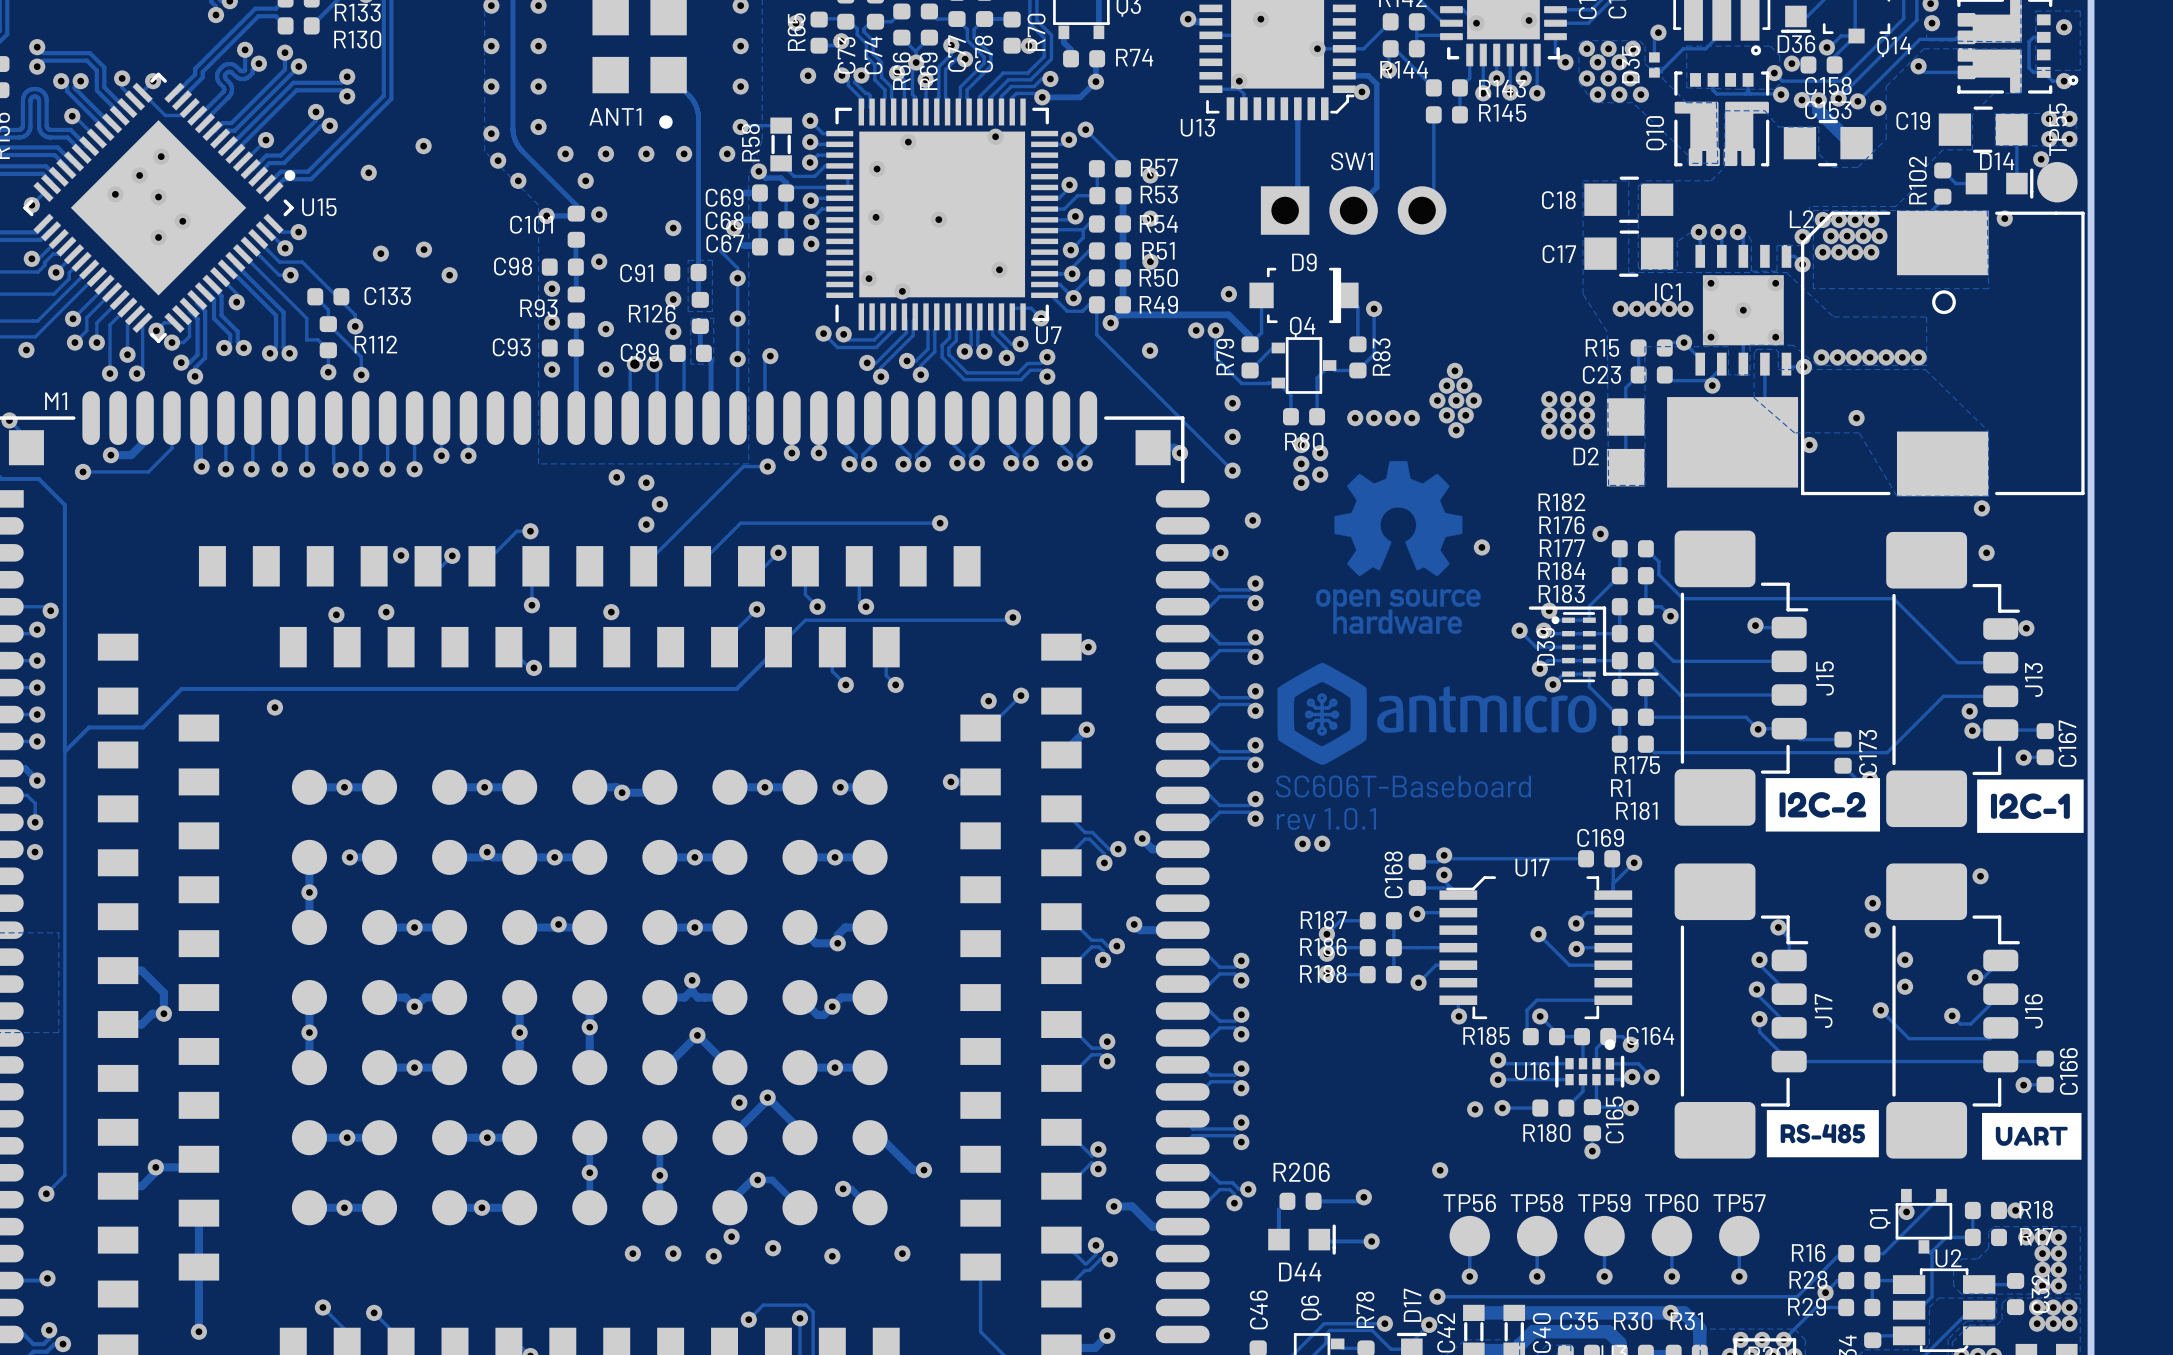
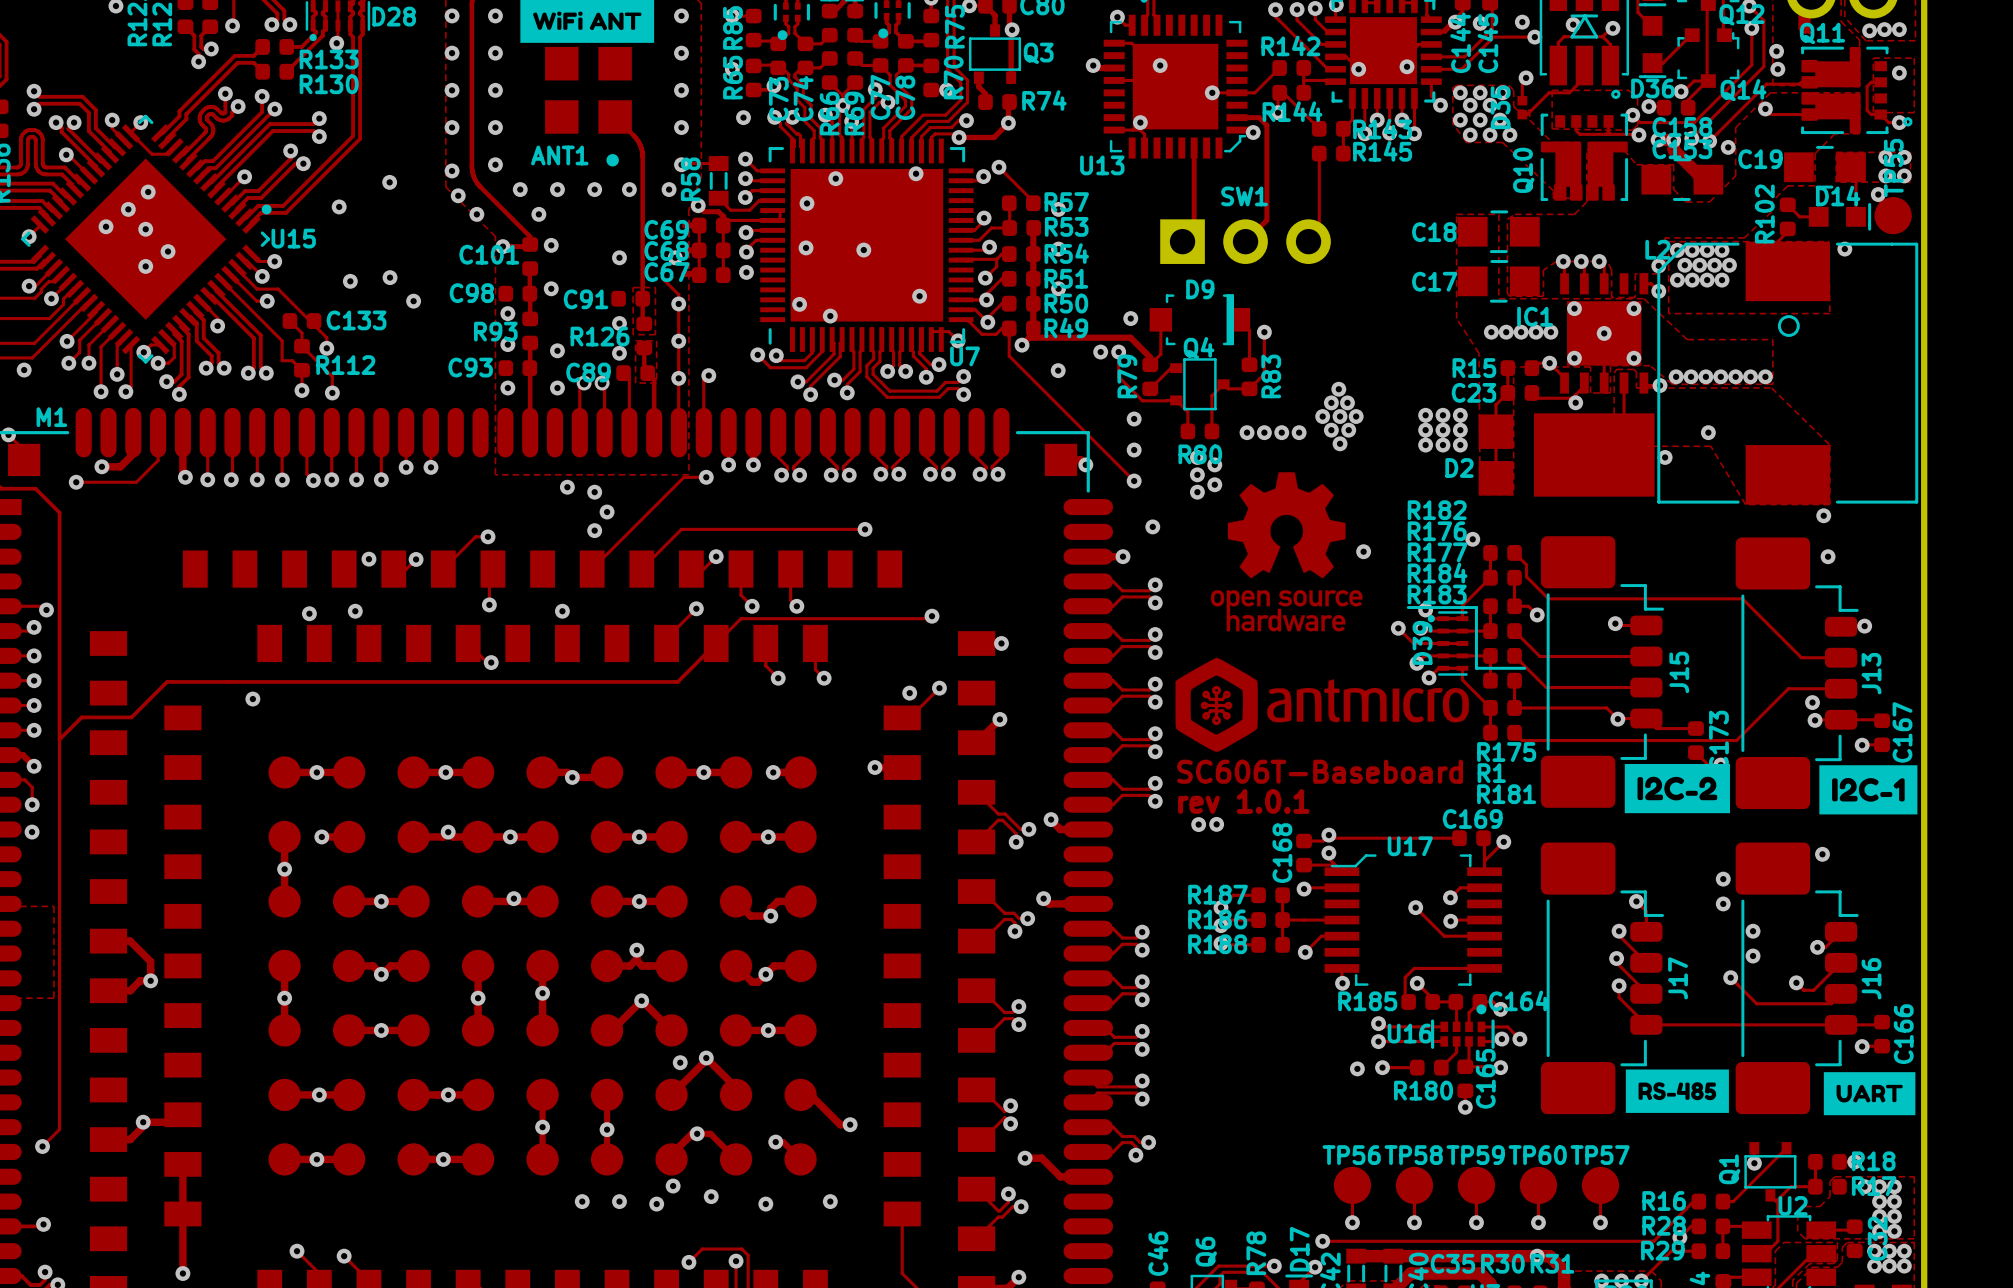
via: (1440, 1170) -> none
track: (1363, 1197) (1359, 1201) (1313, 1201) -> none
via: (1363, 1197) -> none
track: (1287, 1201) (1278, 1209) (1278, 1239) -> none
R206: (1300, 1201) -> none
D44: (1301, 1239) -> none
track: (1319, 1239) (1321, 1241) (1371, 1241) -> none
via: (1371, 1241) -> none

